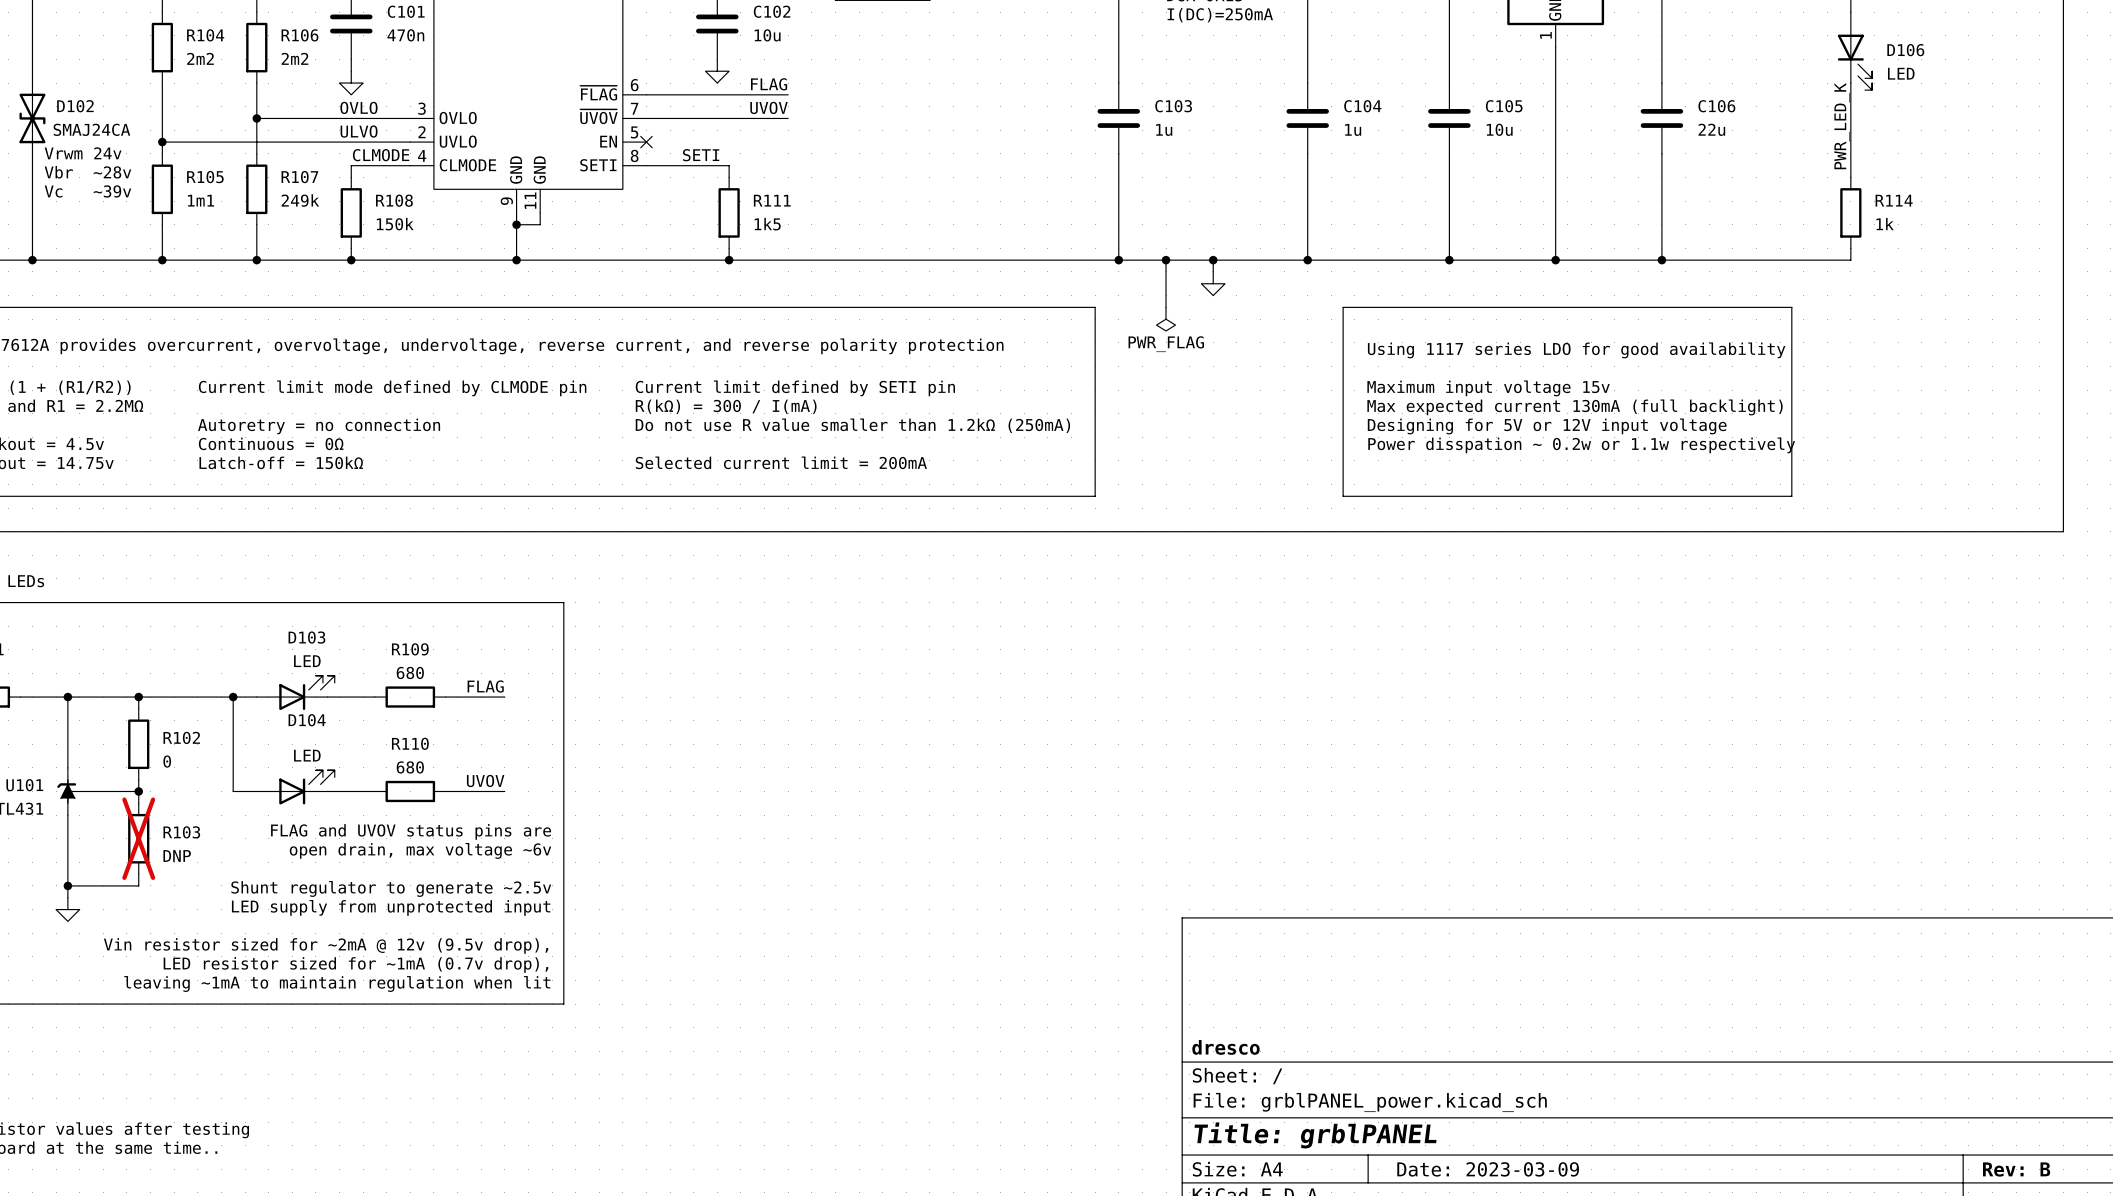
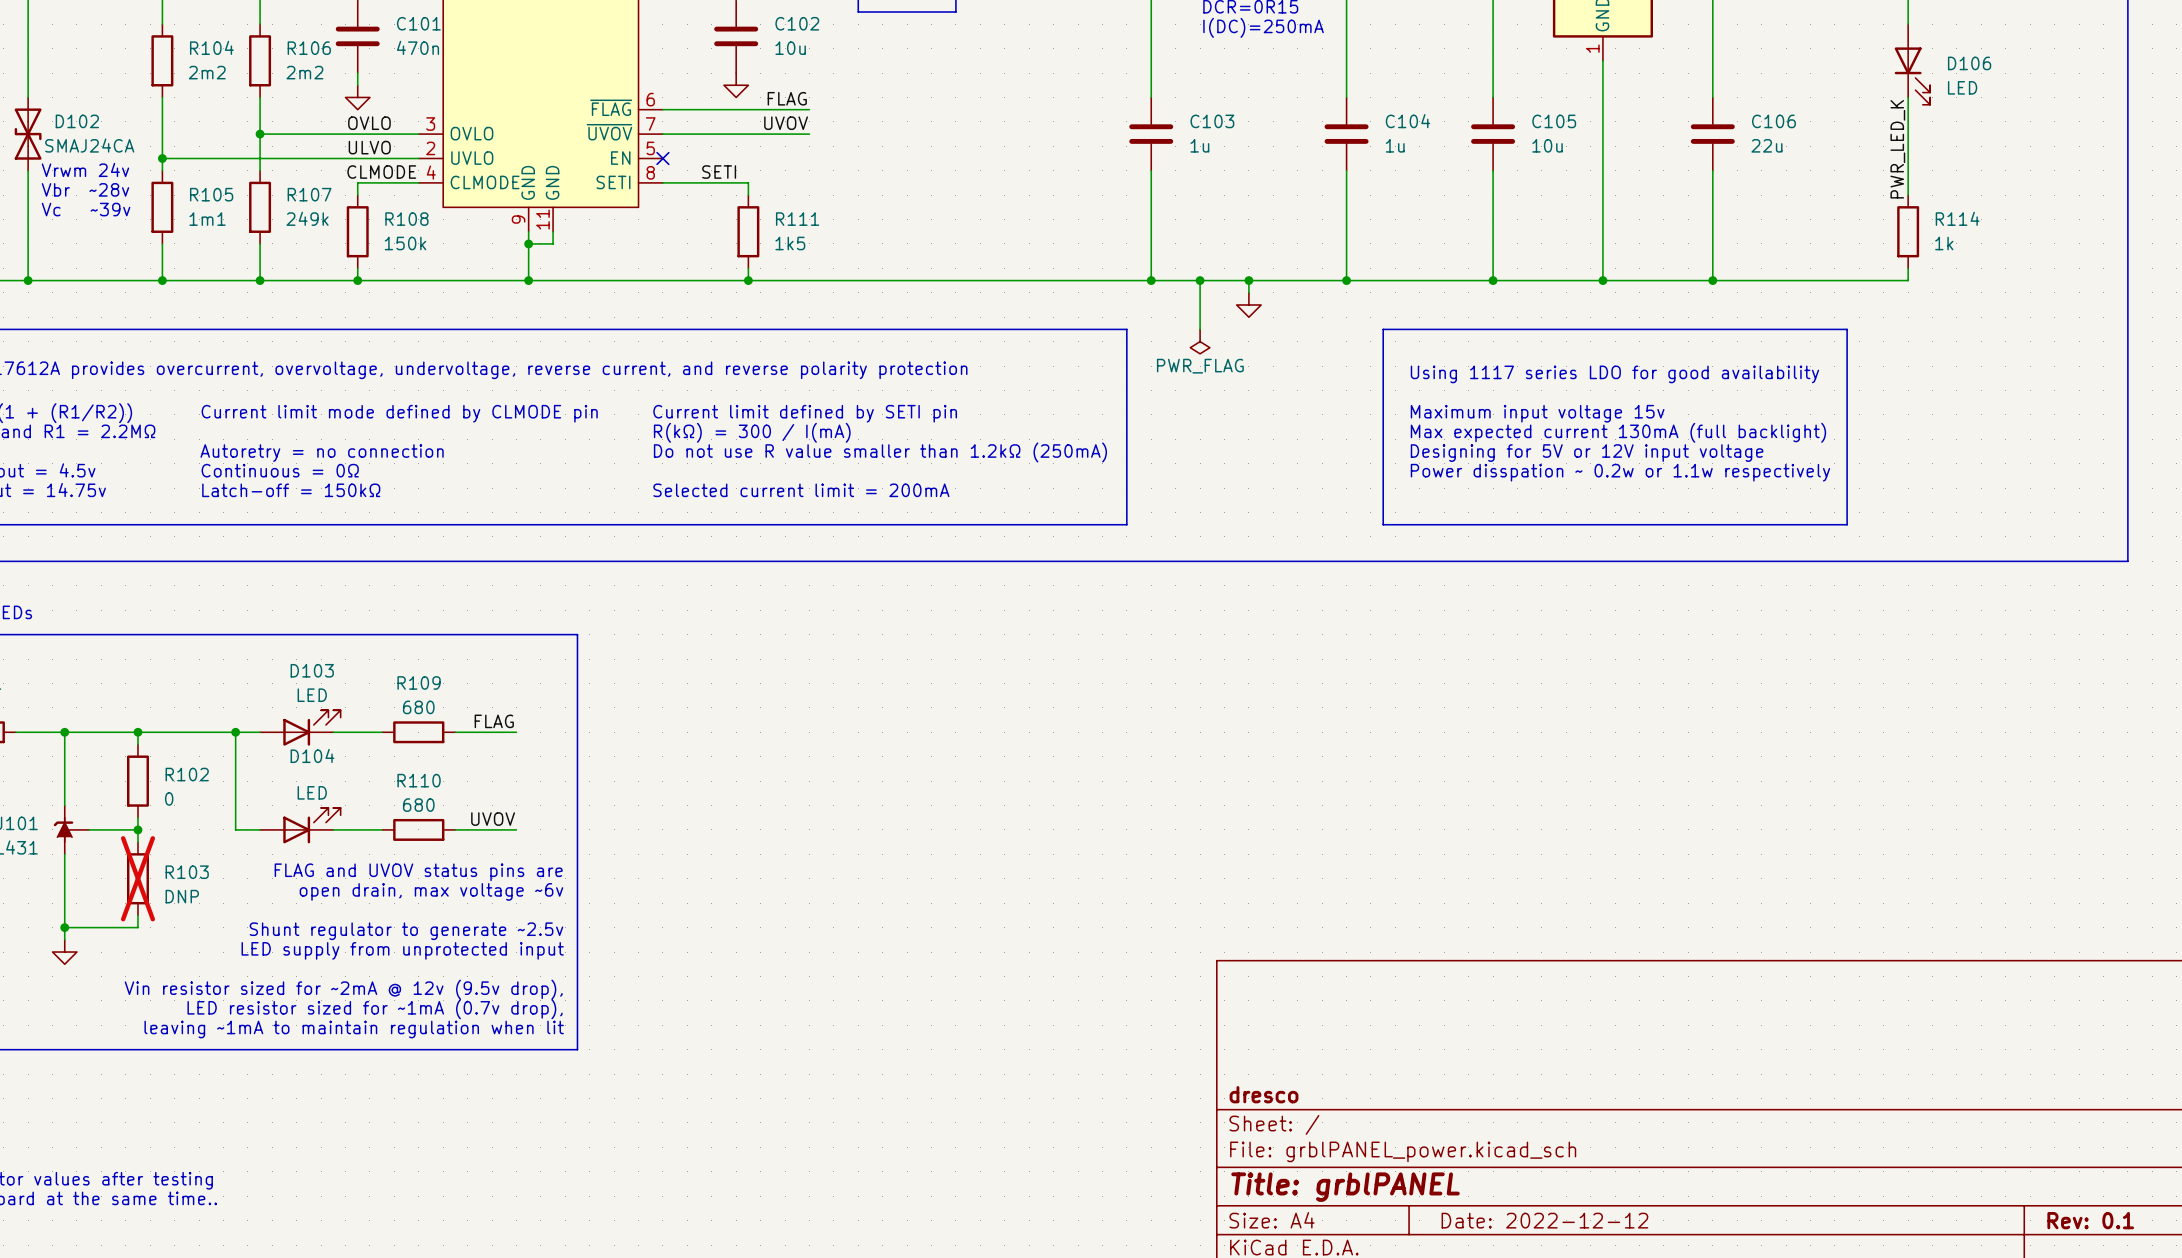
title block: Date: 2023-03-09 (1488, 1169) -> Date: 2022-12-12 (1544, 1220)
title block: Rev: B (2016, 1169) -> Rev: 0.1 (2090, 1220)

